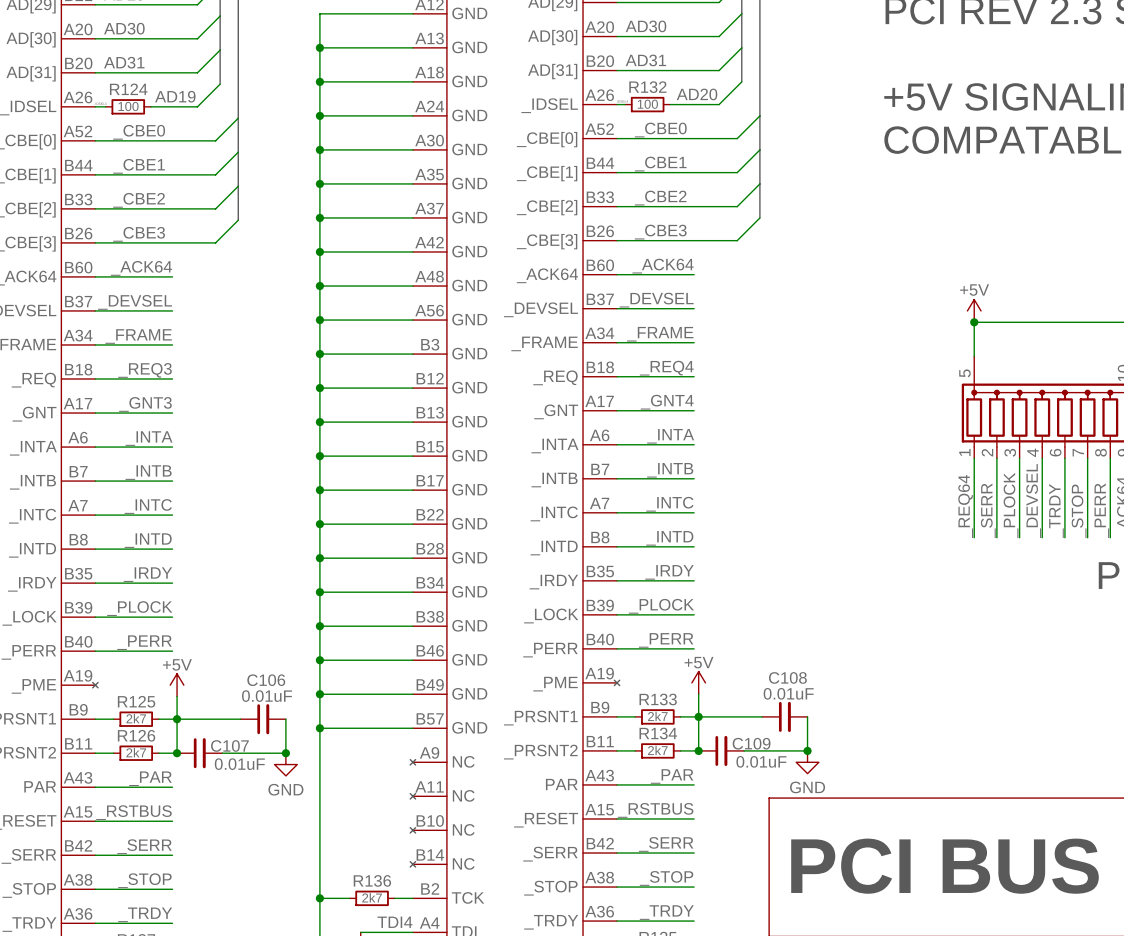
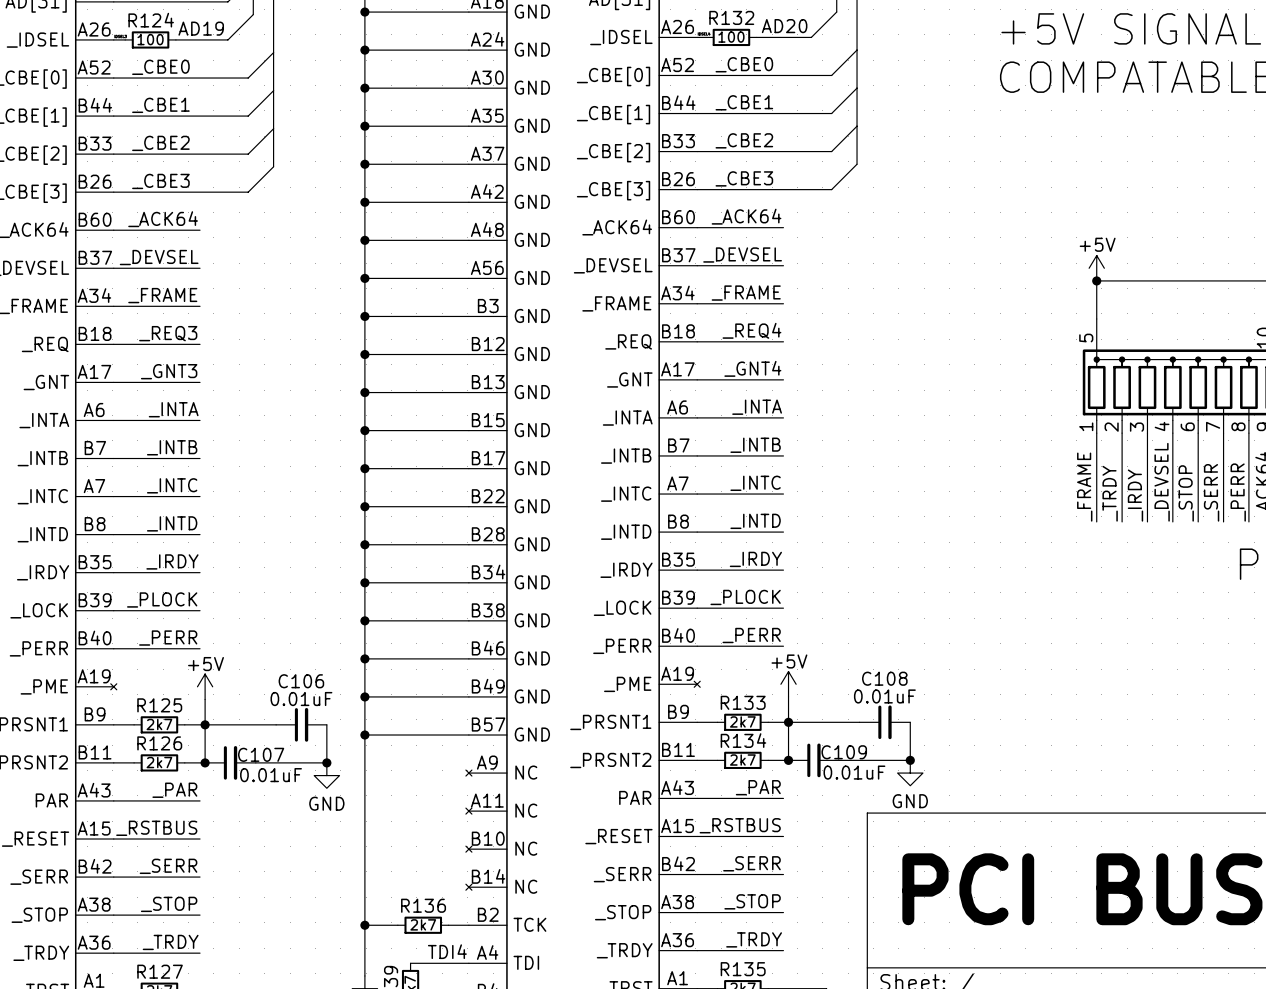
label: _PLOCK (1011, 505) -> _IRDY (1135, 495)
label: _REQ64 (965, 506) -> _FRAME (1084, 487)
label position: _SERR (988, 510) -> _SERR (1211, 492)
label position: _TRDY (1056, 511) -> _TRDY (1110, 493)
label position: _STOP (1079, 511) -> _STOP (1186, 493)

